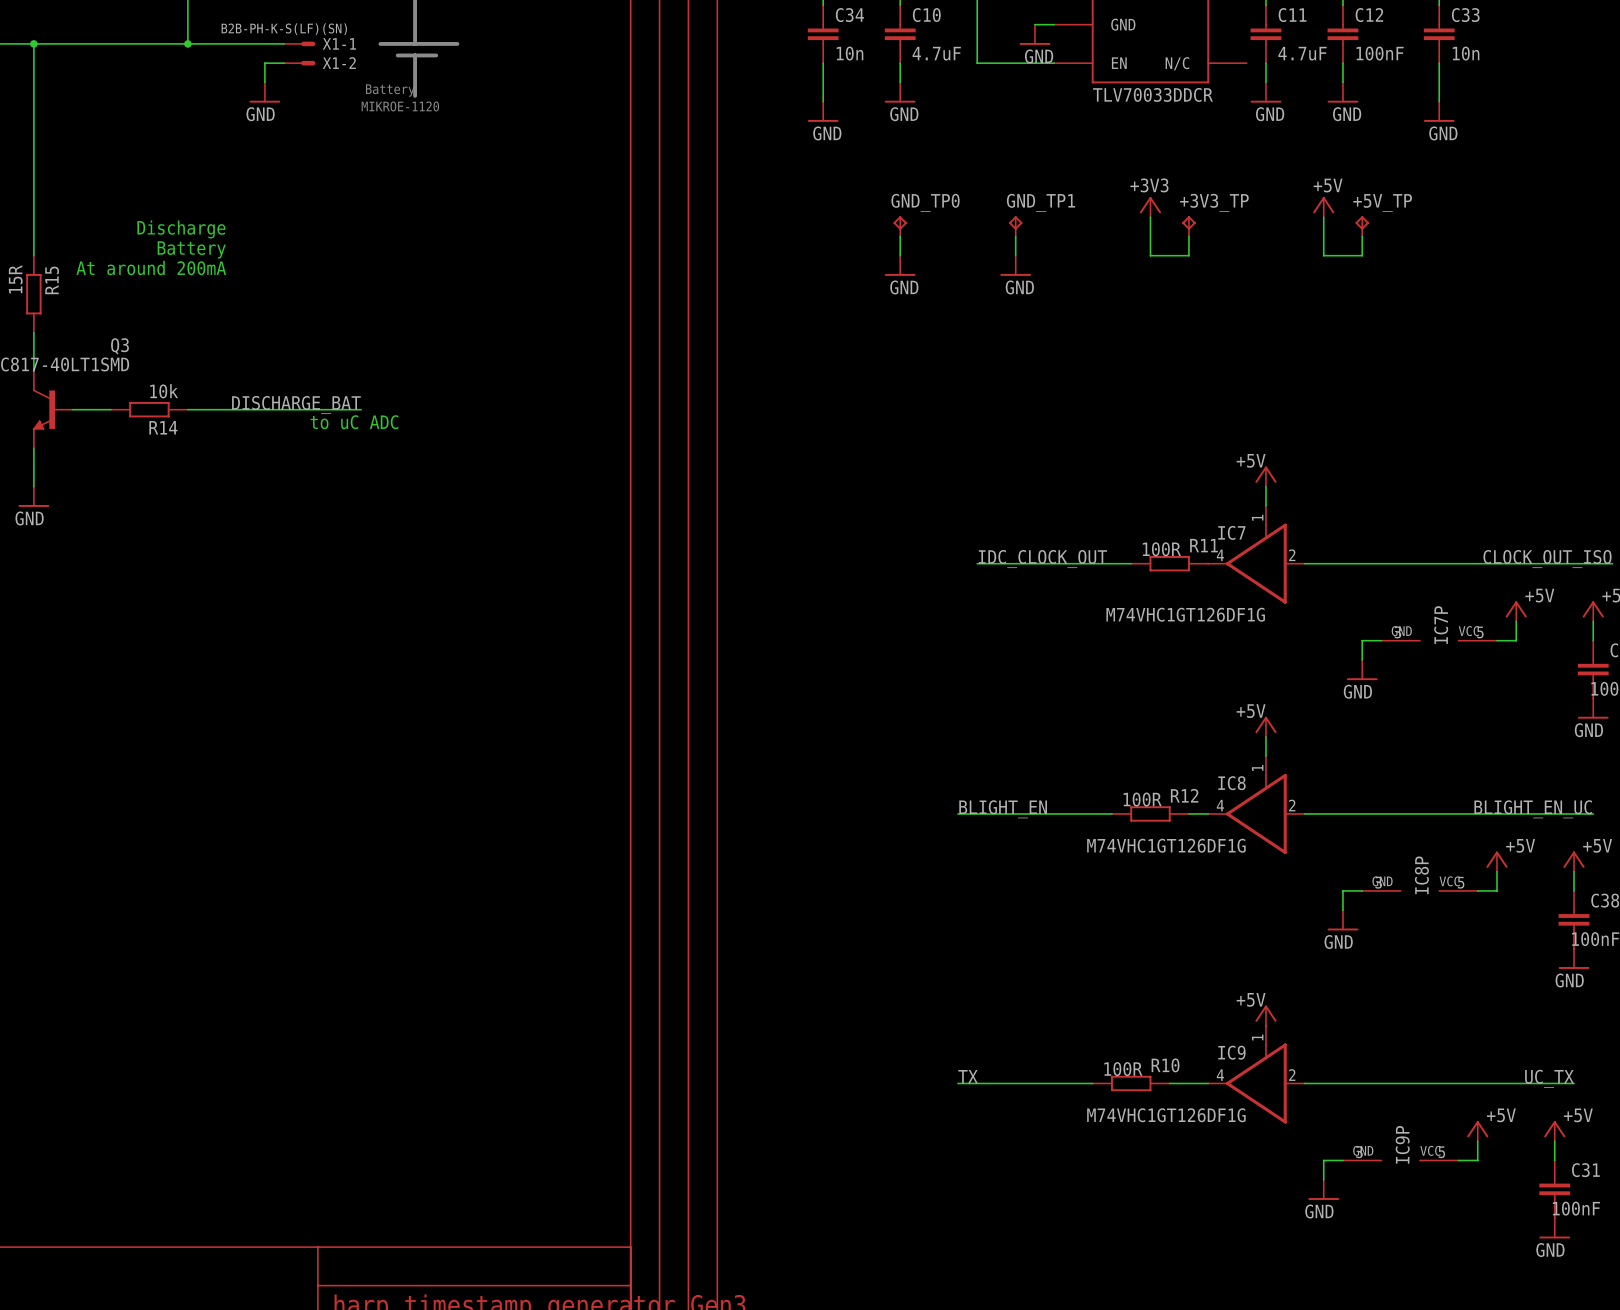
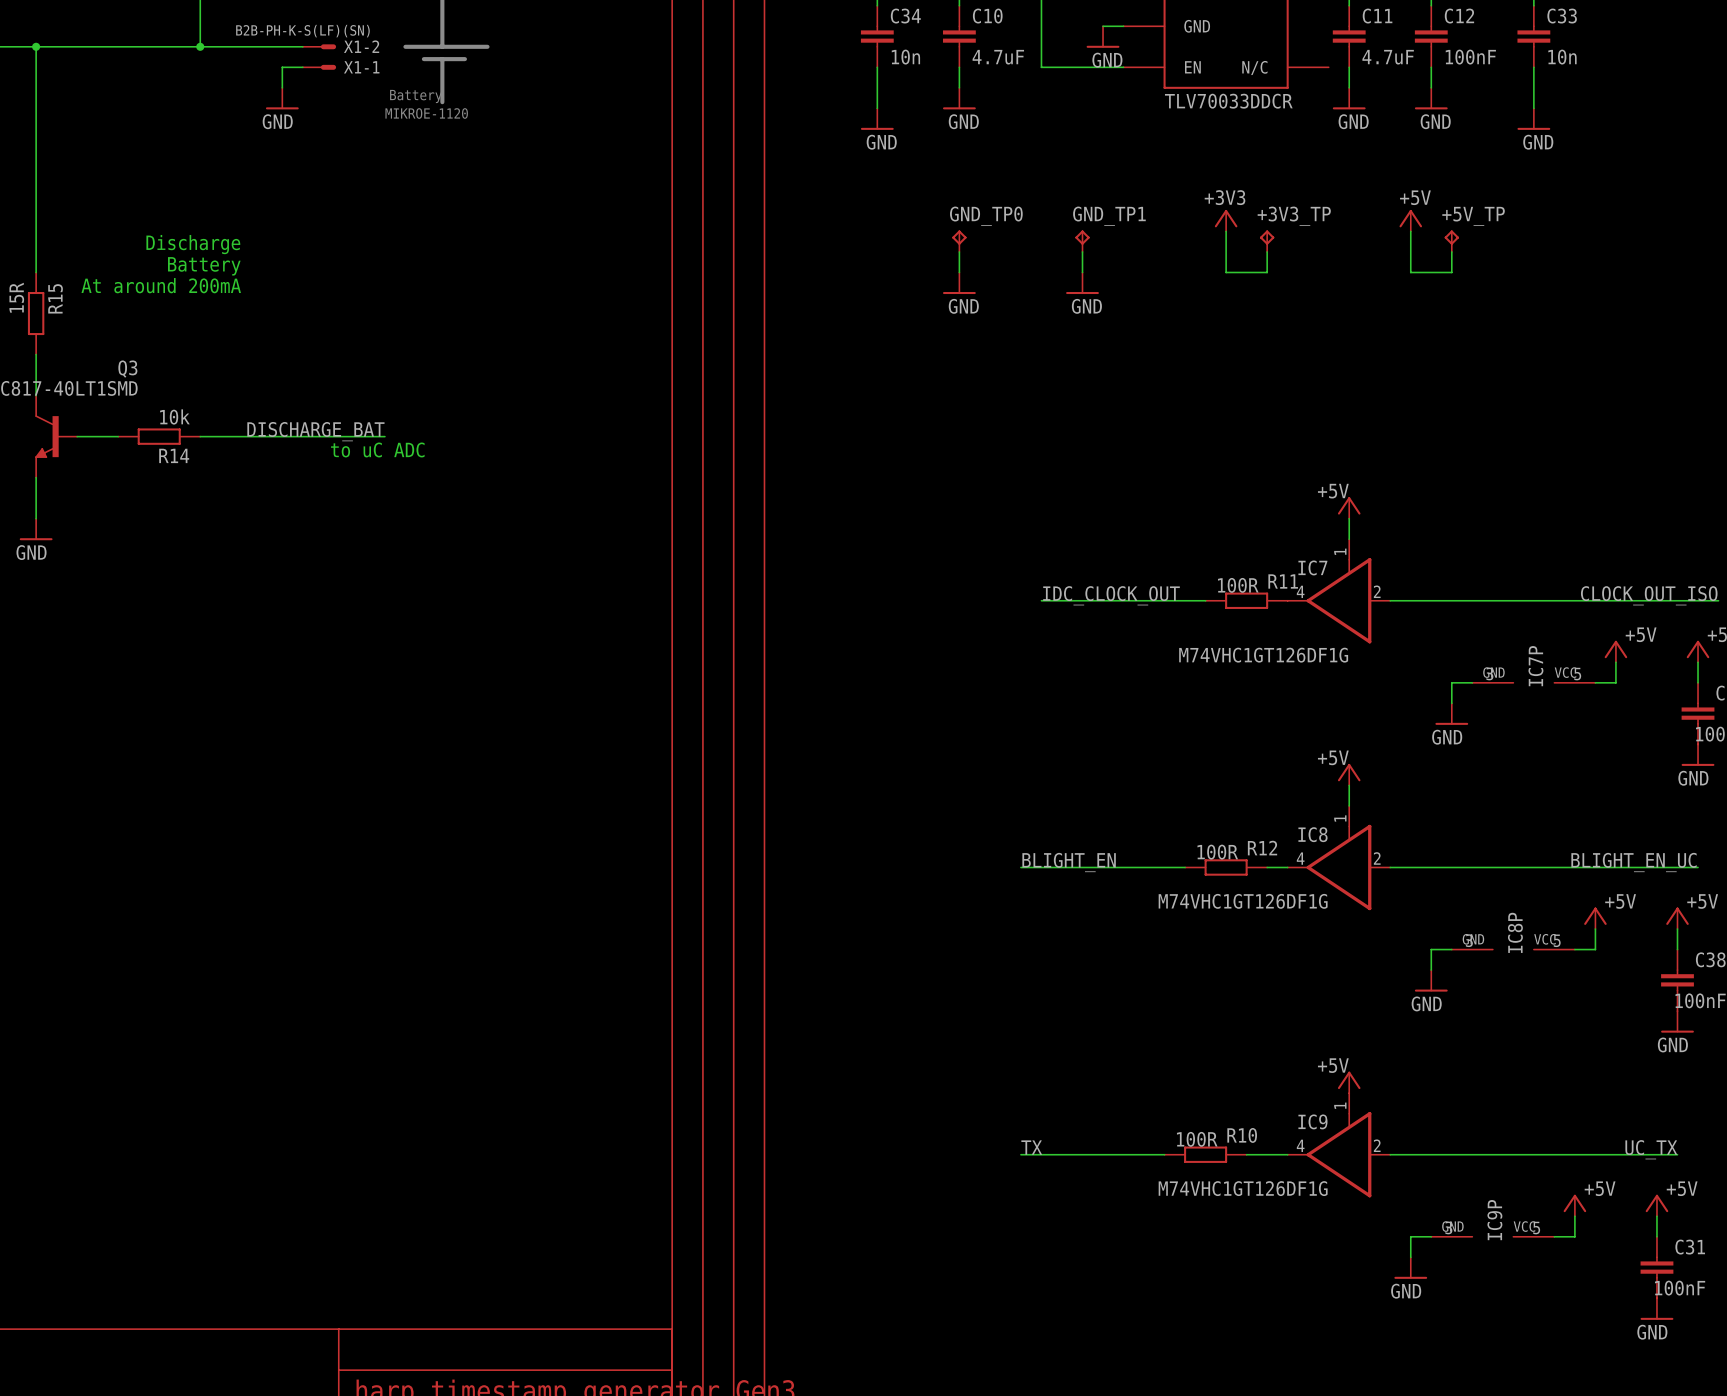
X1-1 name: X1-1 (339, 43) -> X1-2 (361, 46)
X1-2 name: X1-2 (339, 63) -> X1-1 (361, 67)

